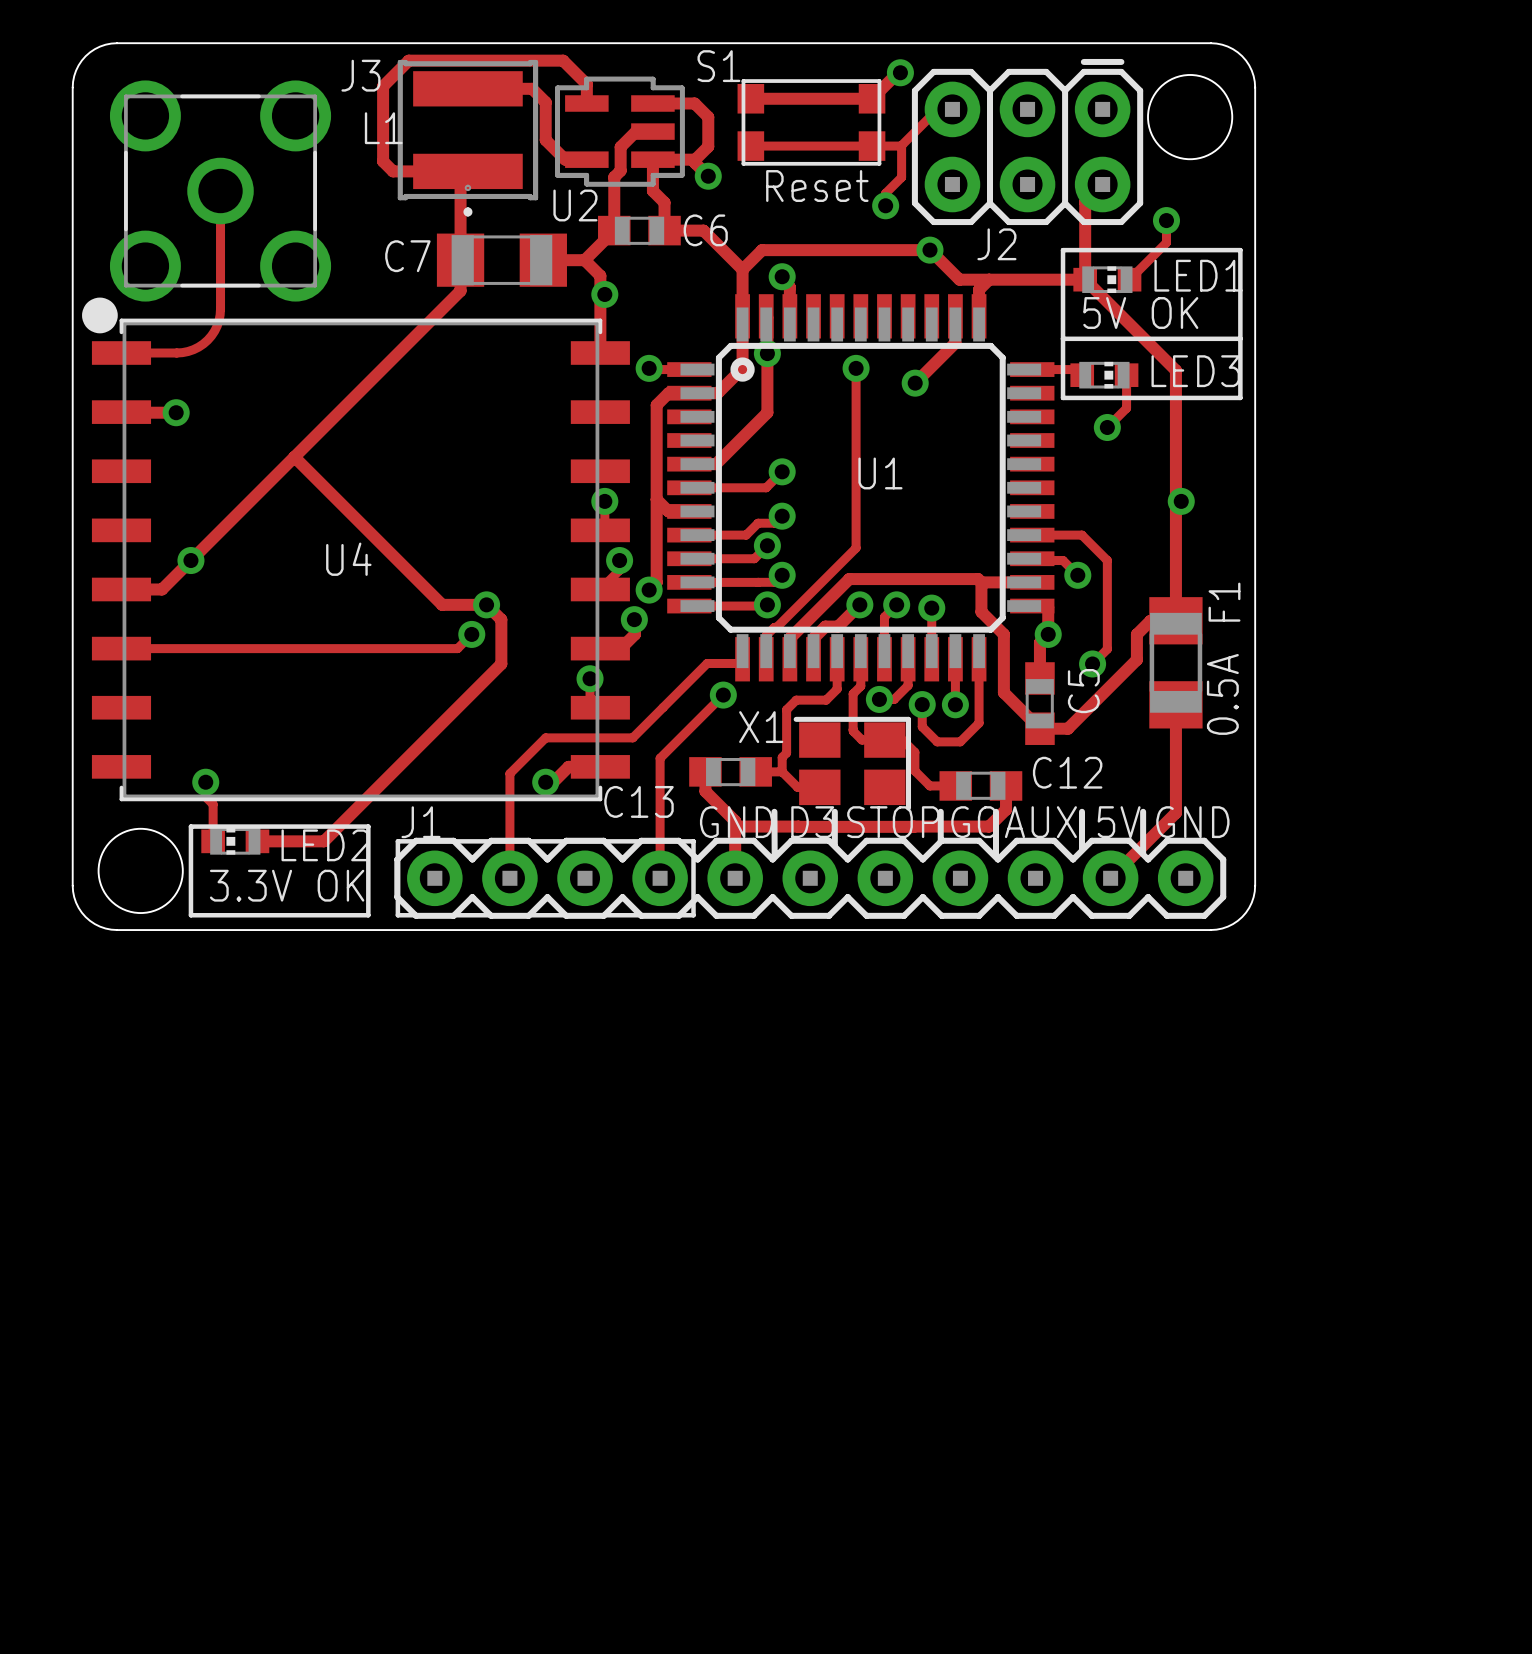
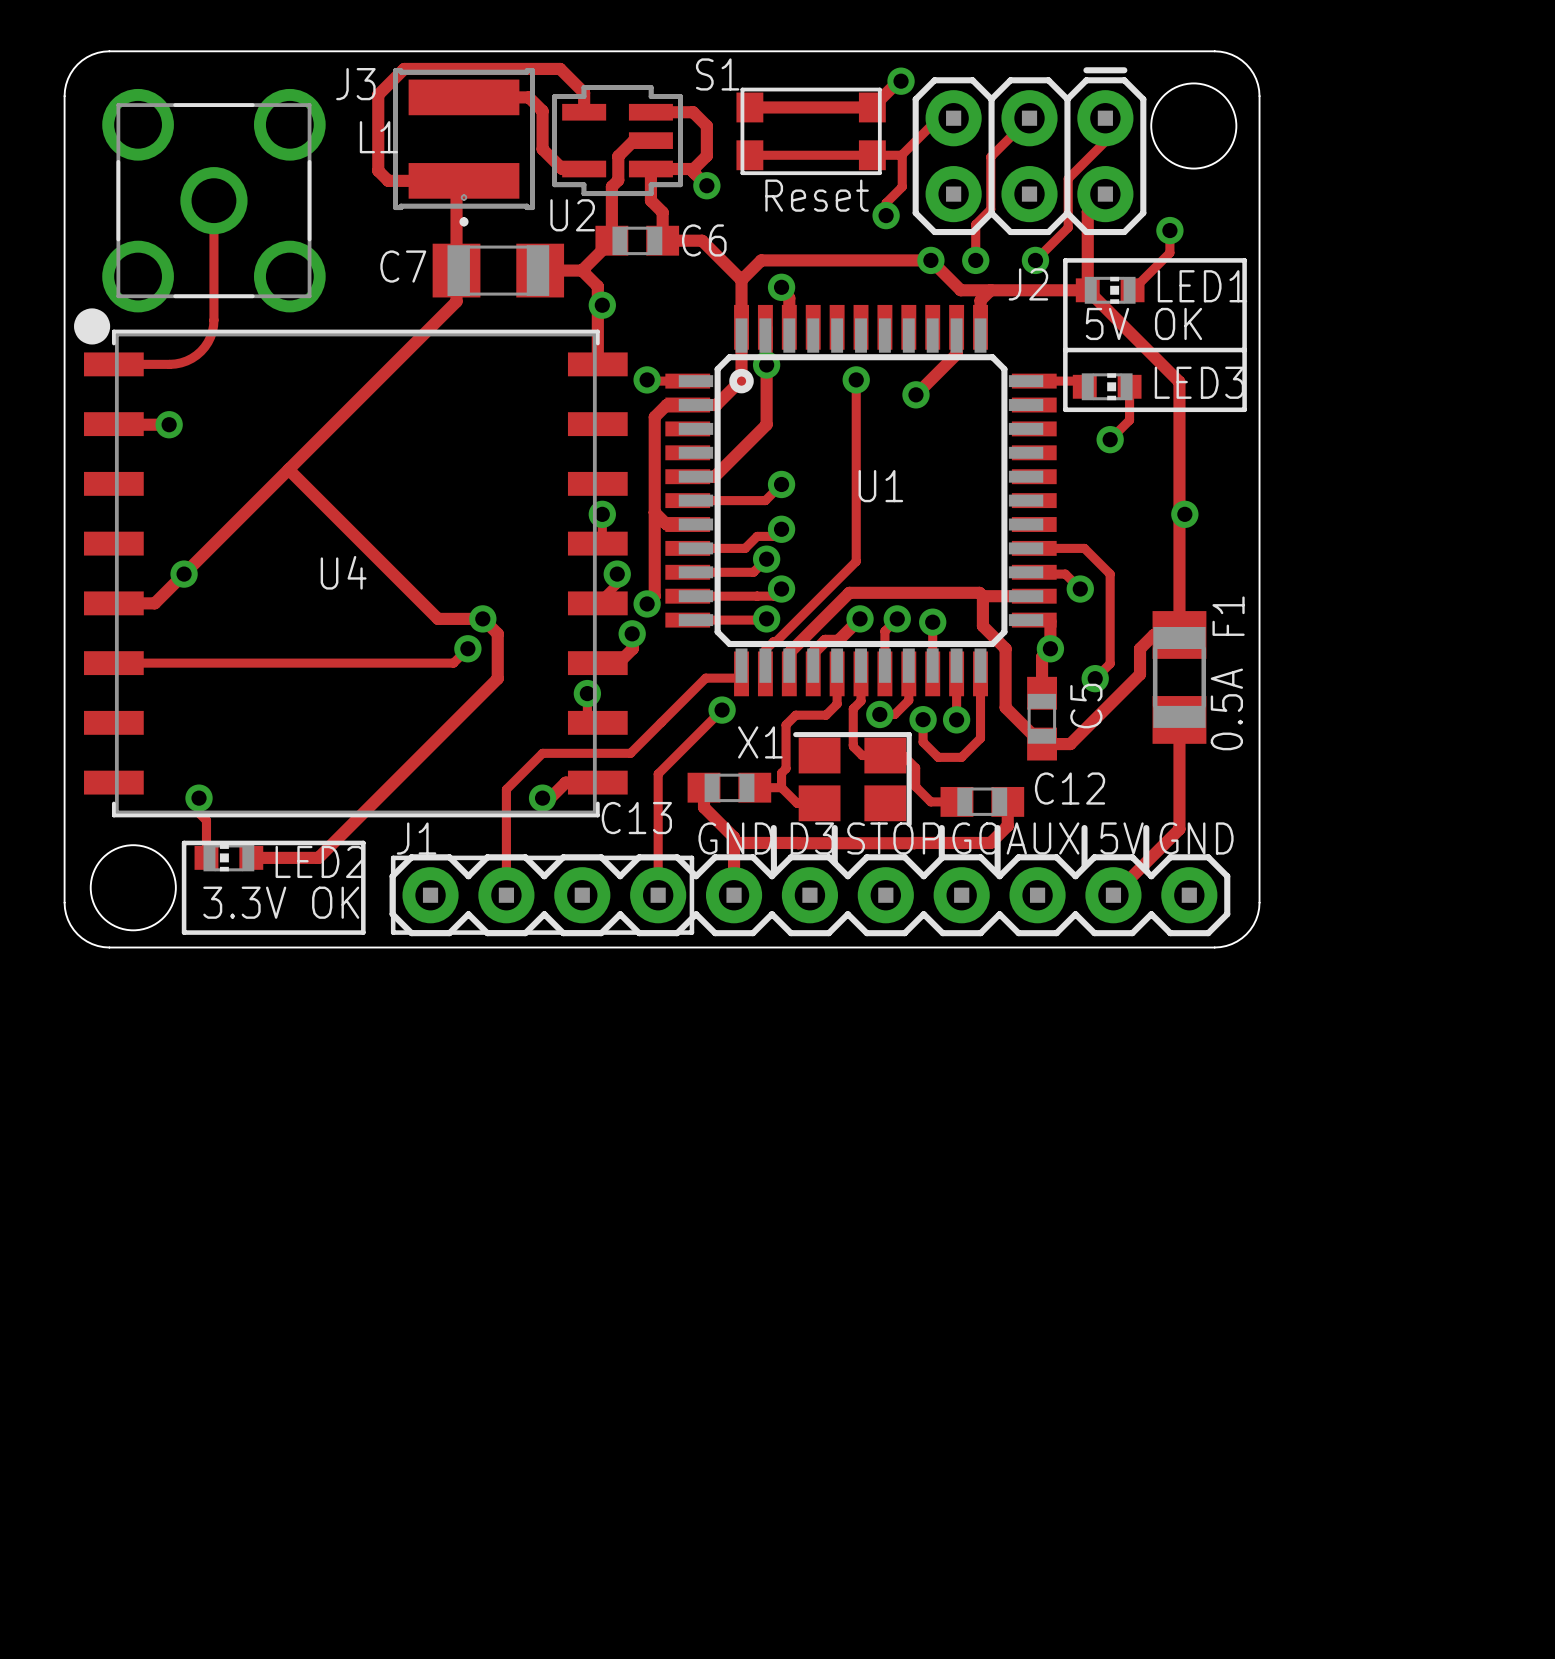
track: none -> (1029, 118) (990, 156) (990, 209) (975, 224) (975, 260)
track: none -> (1105, 118) (1105, 141) (1068, 178) (1068, 227) (1035, 260)
J2 name position: J2 (996, 244) -> J2 (1028, 284)
via: none -> (975, 260)
via: none -> (1035, 260)

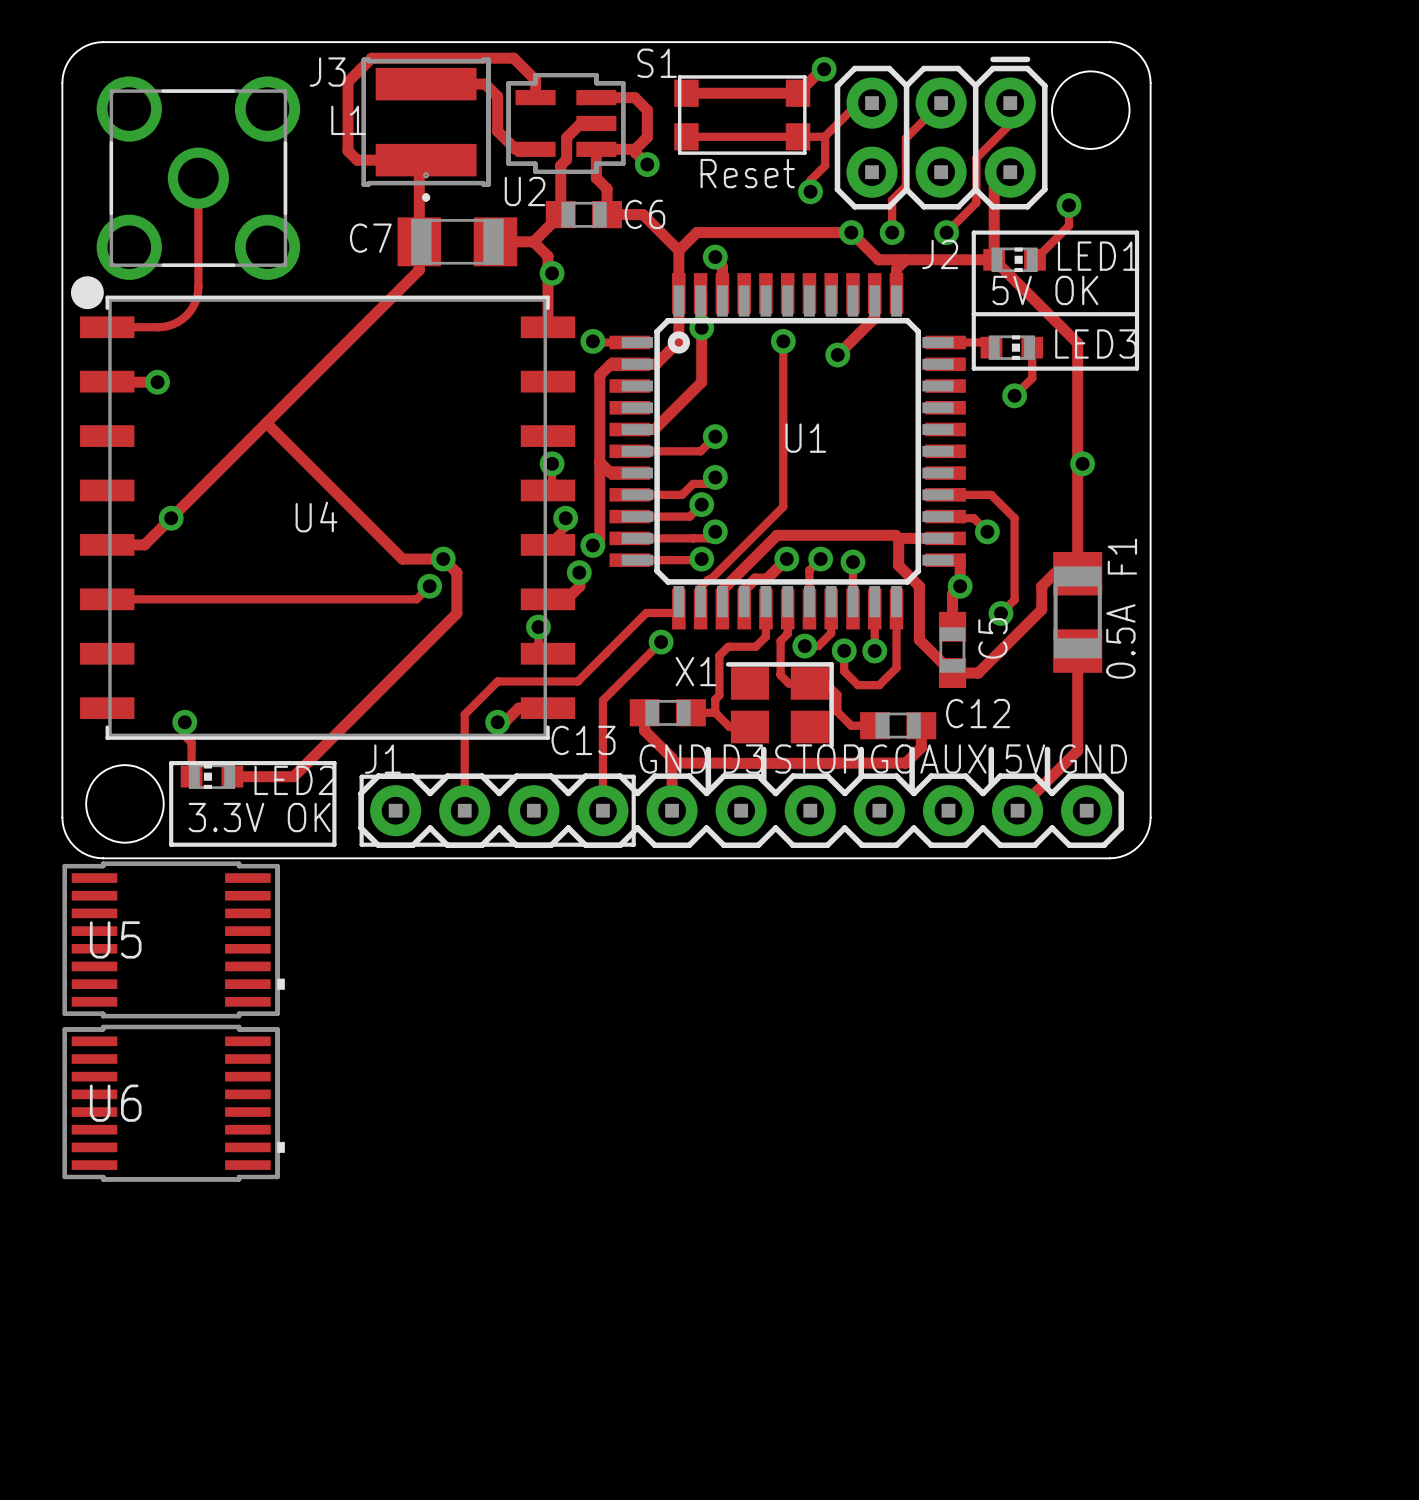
U5: none -> (173, 939)
U6: none -> (173, 1103)

